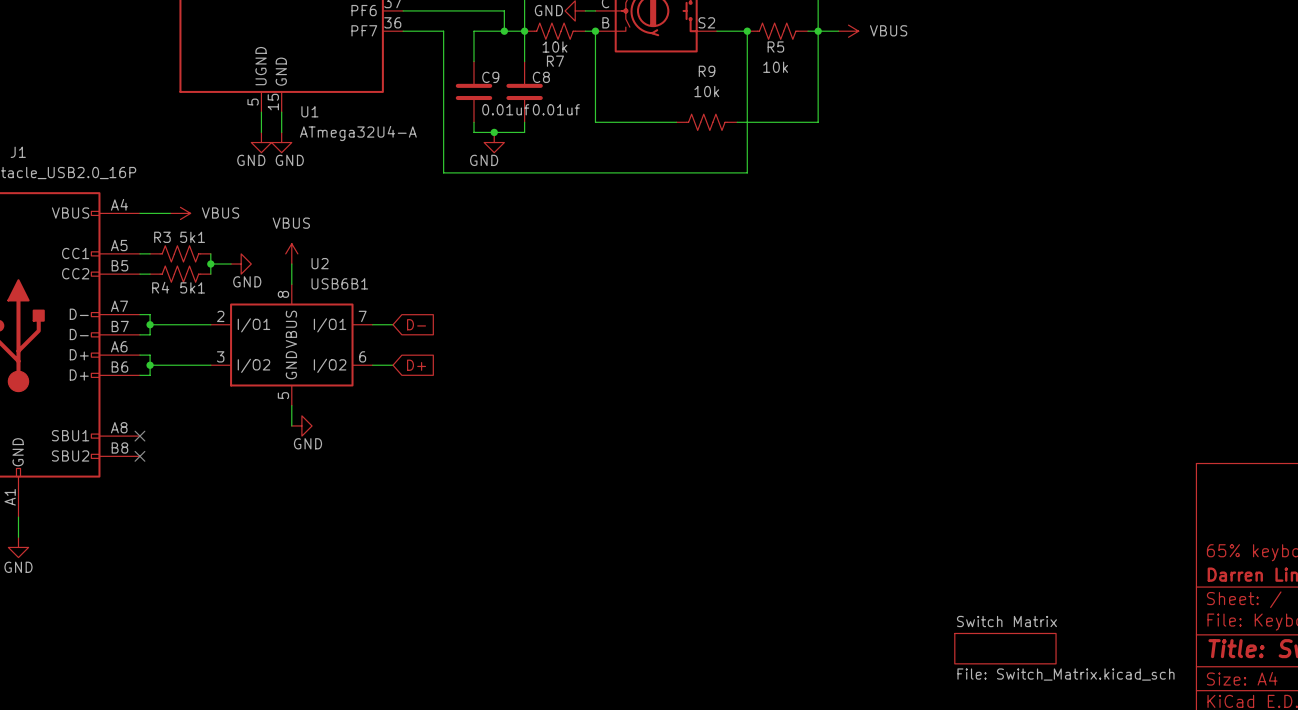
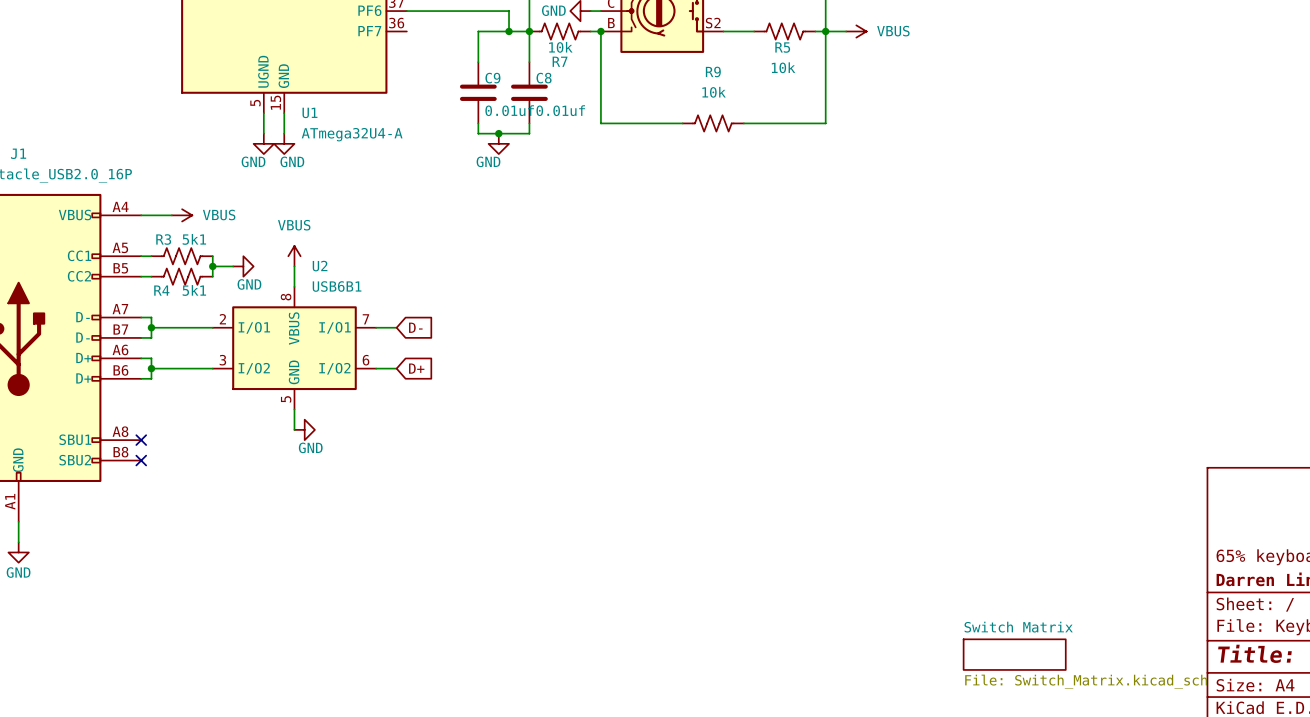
wire: (403, 31) (443, 31) (443, 172) (747, 172) (747, 31) -> none
junction: (747, 31) -> none

